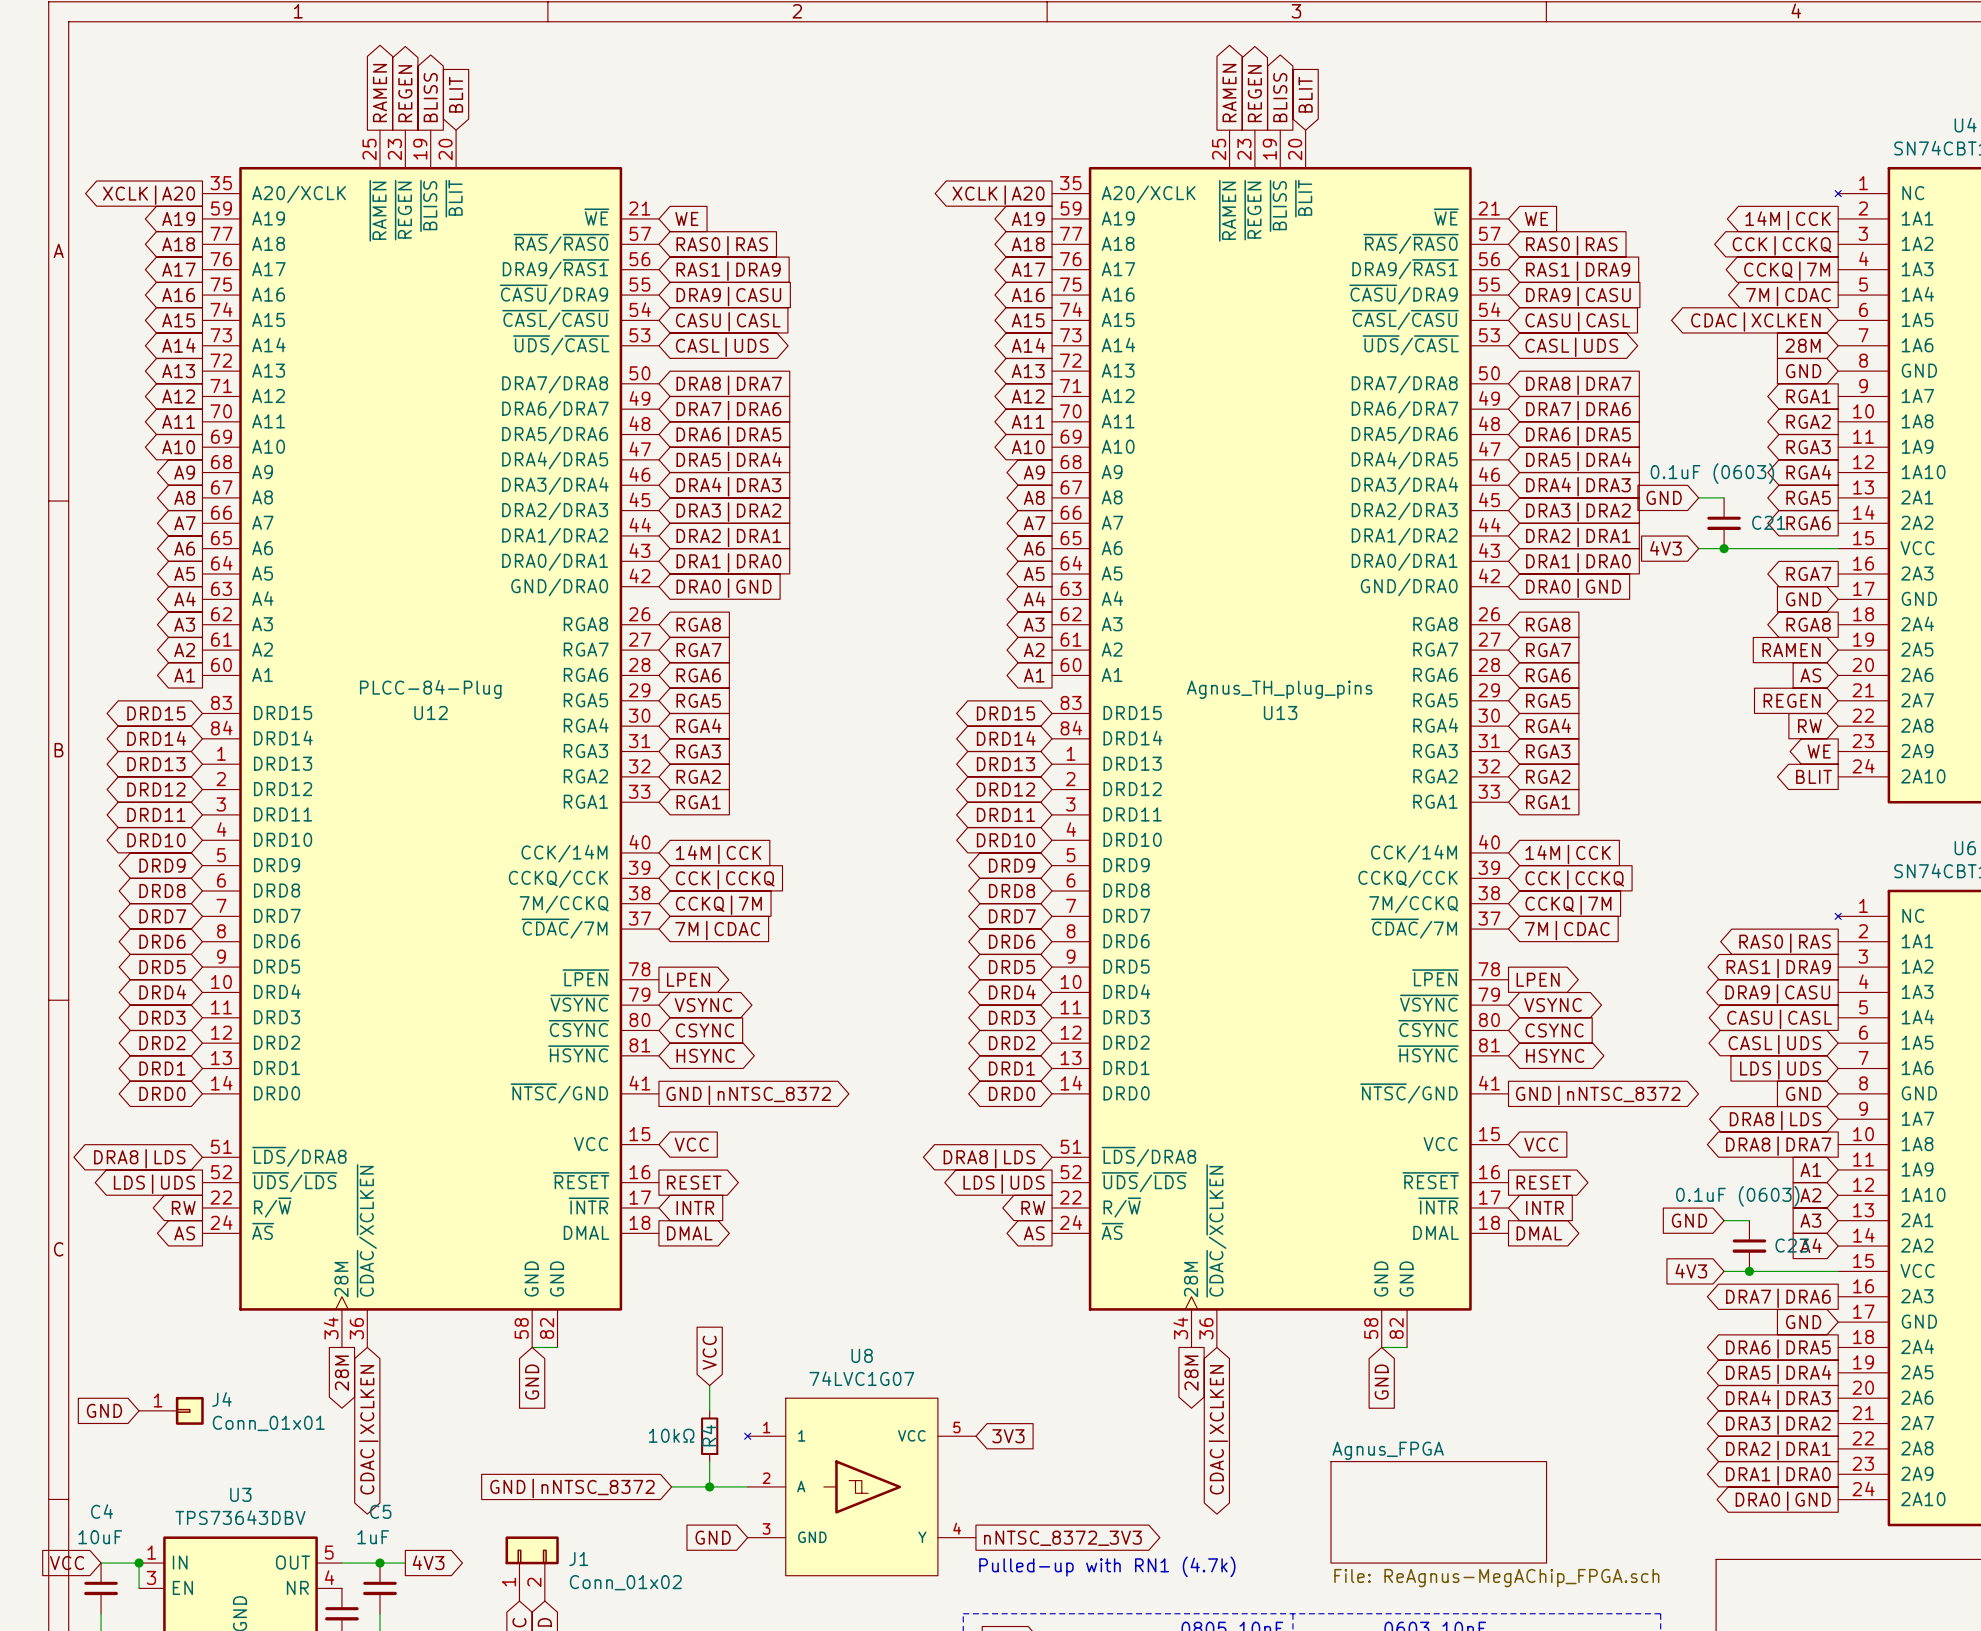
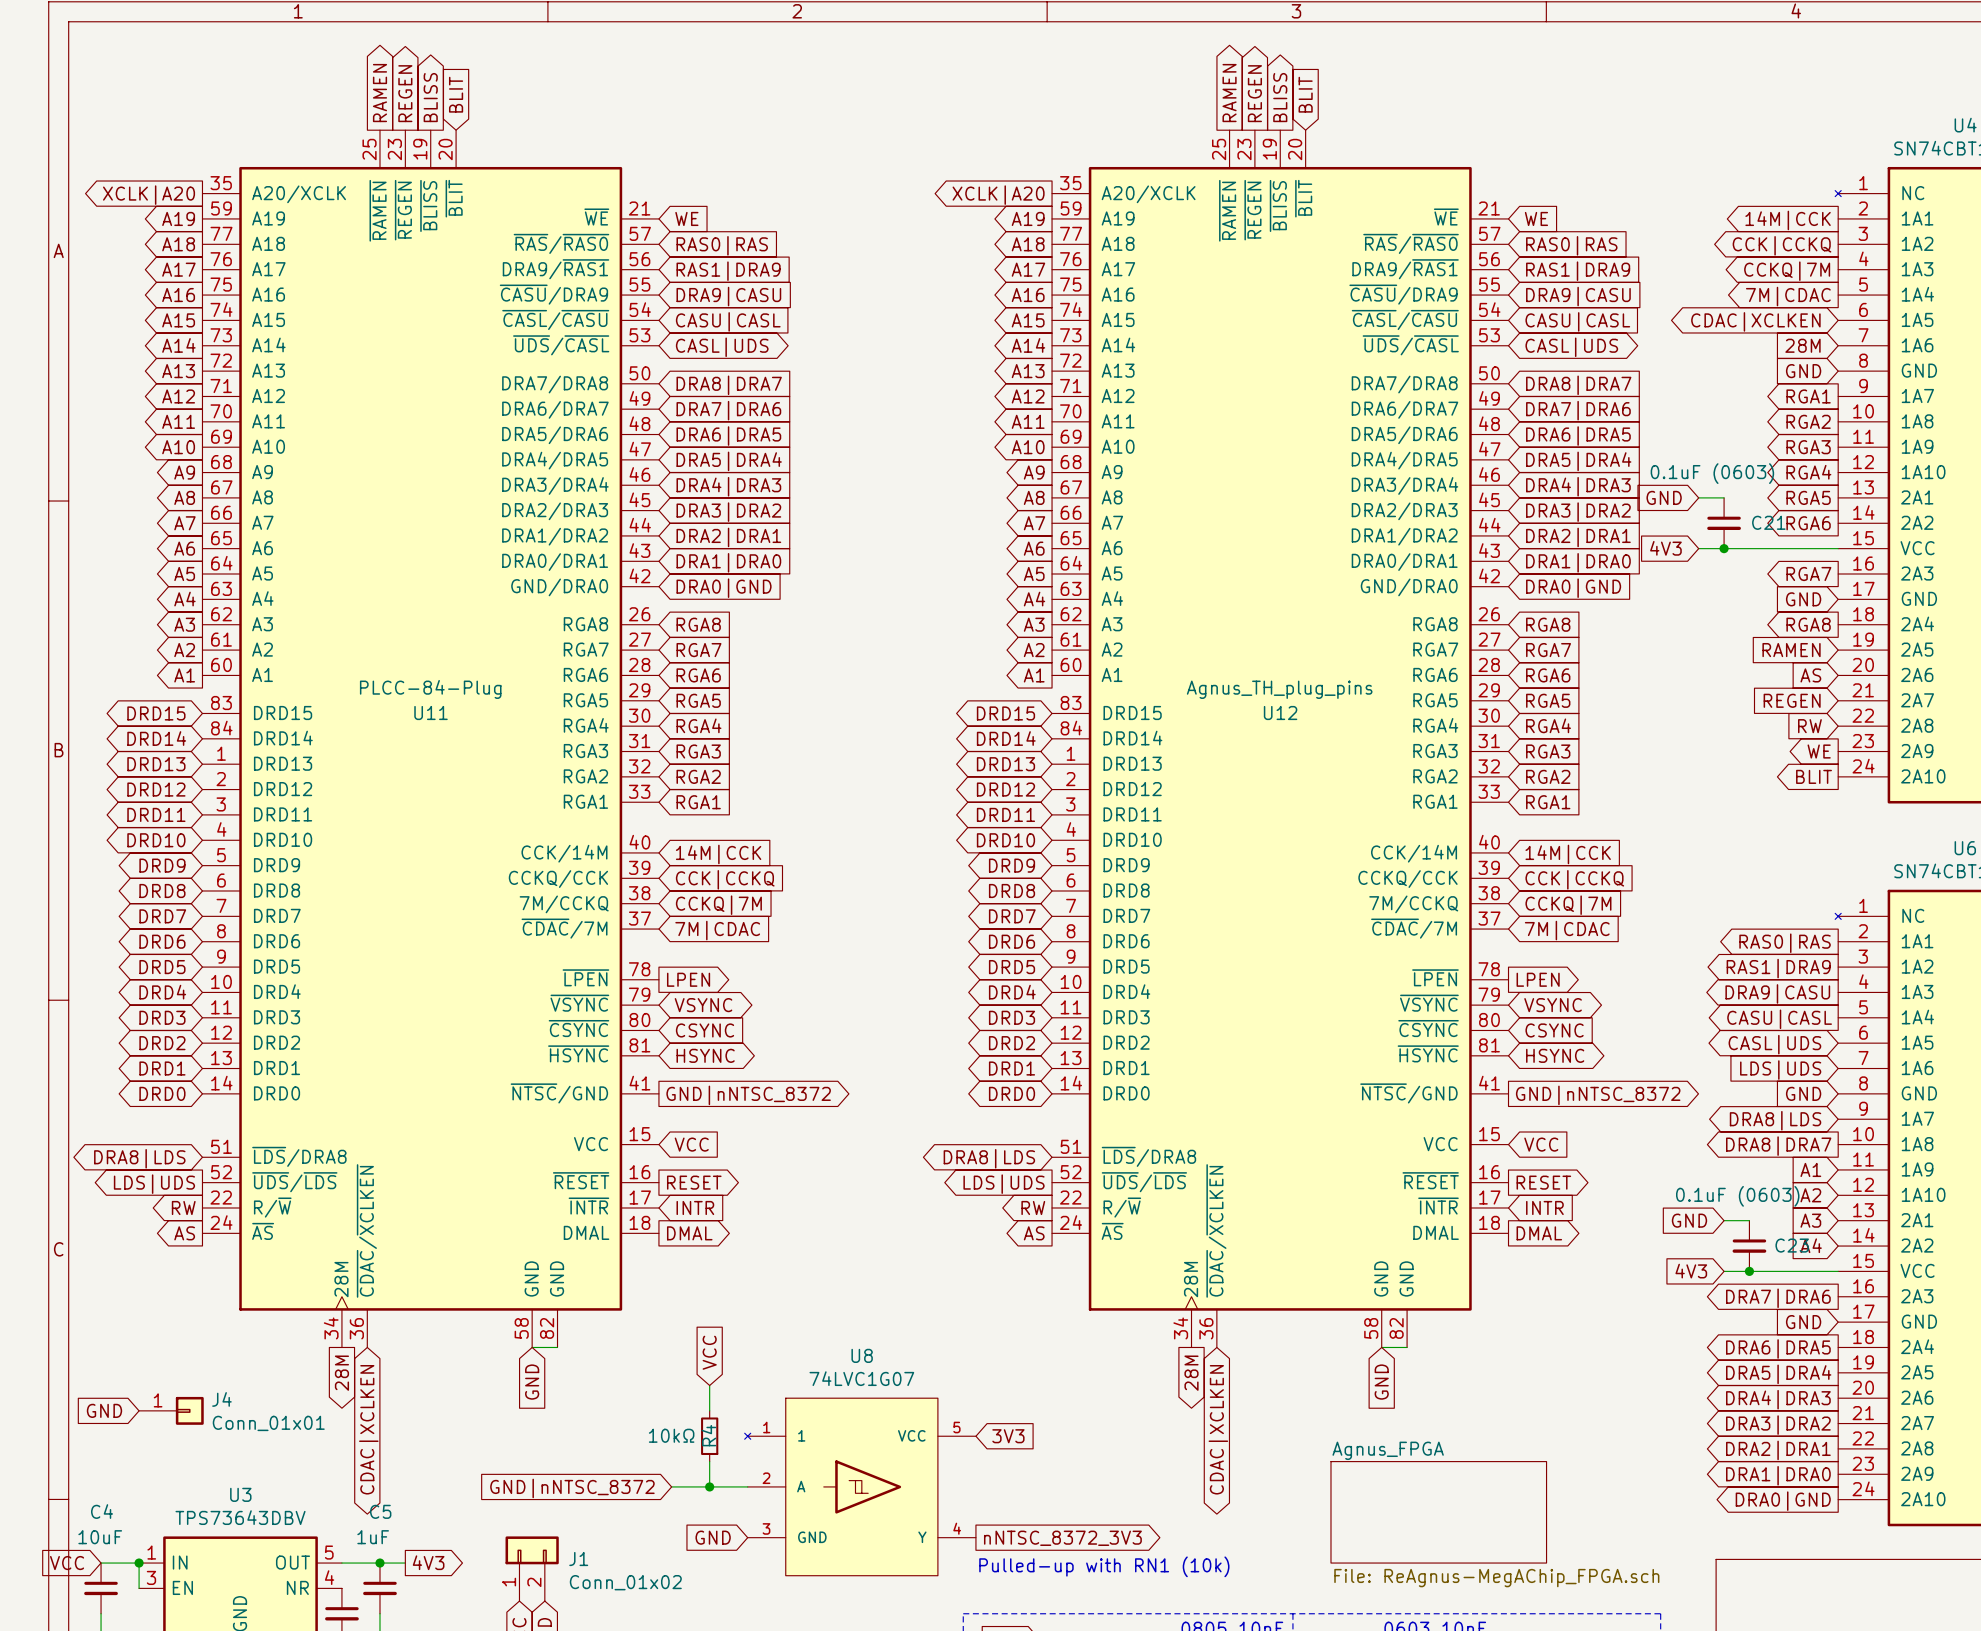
U12 name: U12 (431, 713) -> U11 (431, 713)
U13 name: U13 (1280, 713) -> U12 (1280, 713)
text: Pulled-up with RN1 (4.7k) (1107, 1566) -> Pulled-up with RN1 (10k) (1104, 1566)

